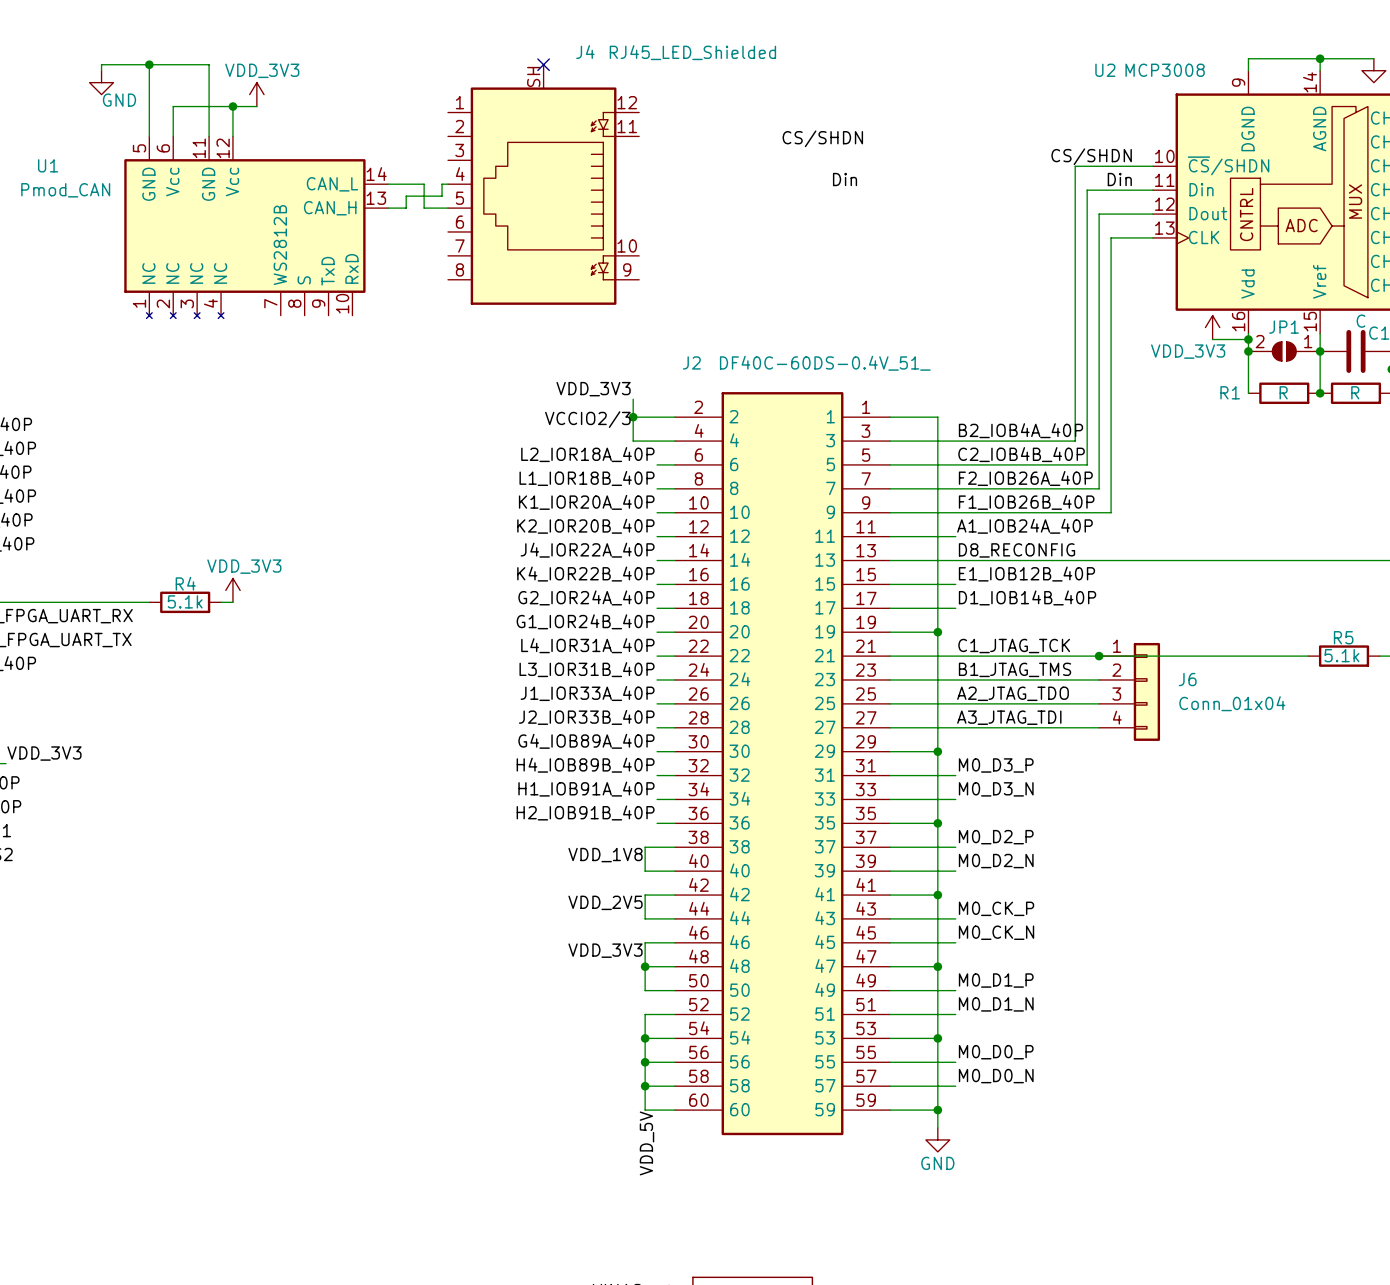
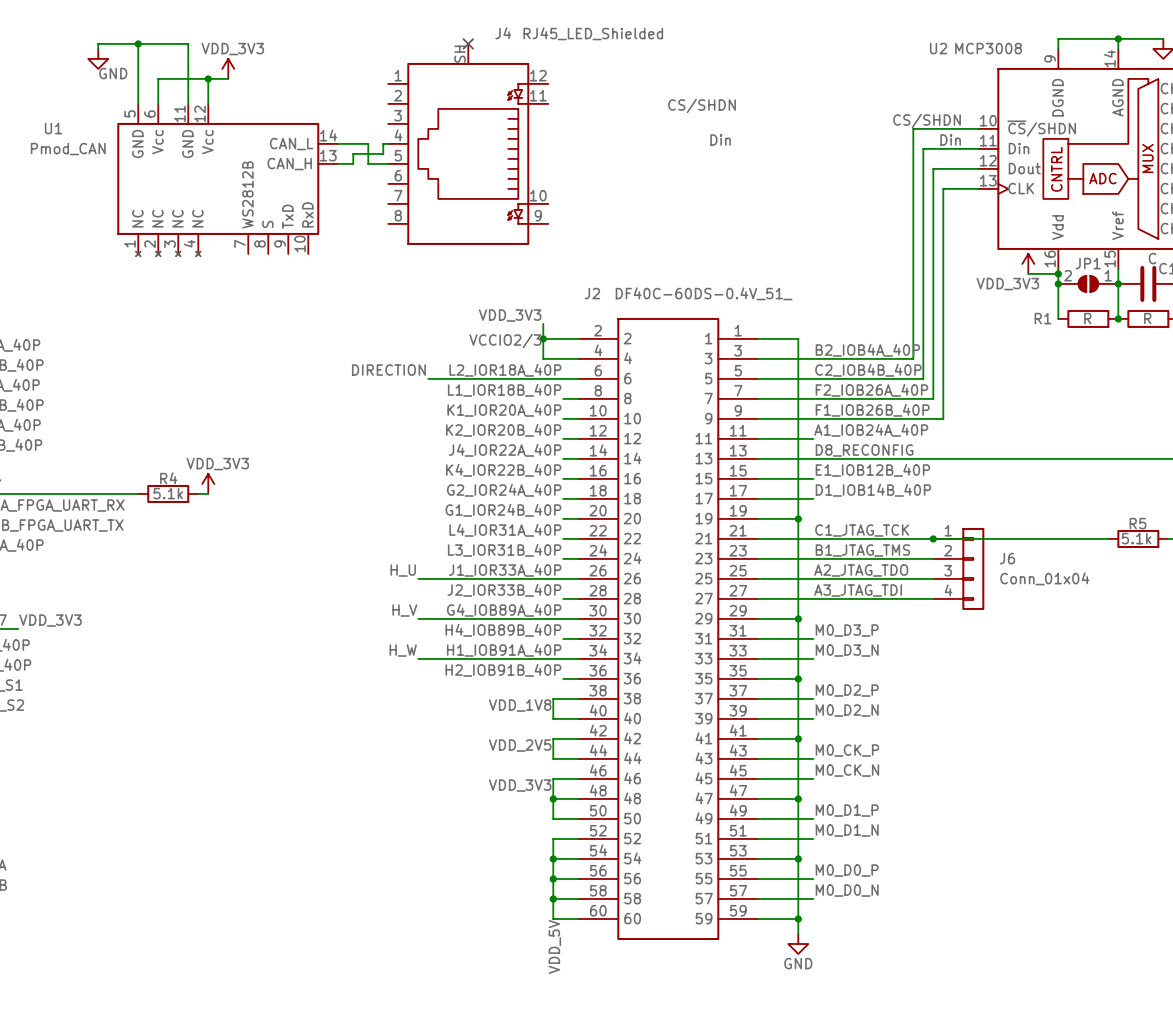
label: none -> DIRECTION (388, 370)
wire: none -> (428, 378) (563, 378)
label: none -> H_U (403, 570)
wire: none -> (418, 578) (563, 578)
label: none -> H_V (404, 610)
wire: none -> (418, 618) (563, 618)
label: none -> H_W (403, 650)
wire: none -> (418, 658) (563, 658)

